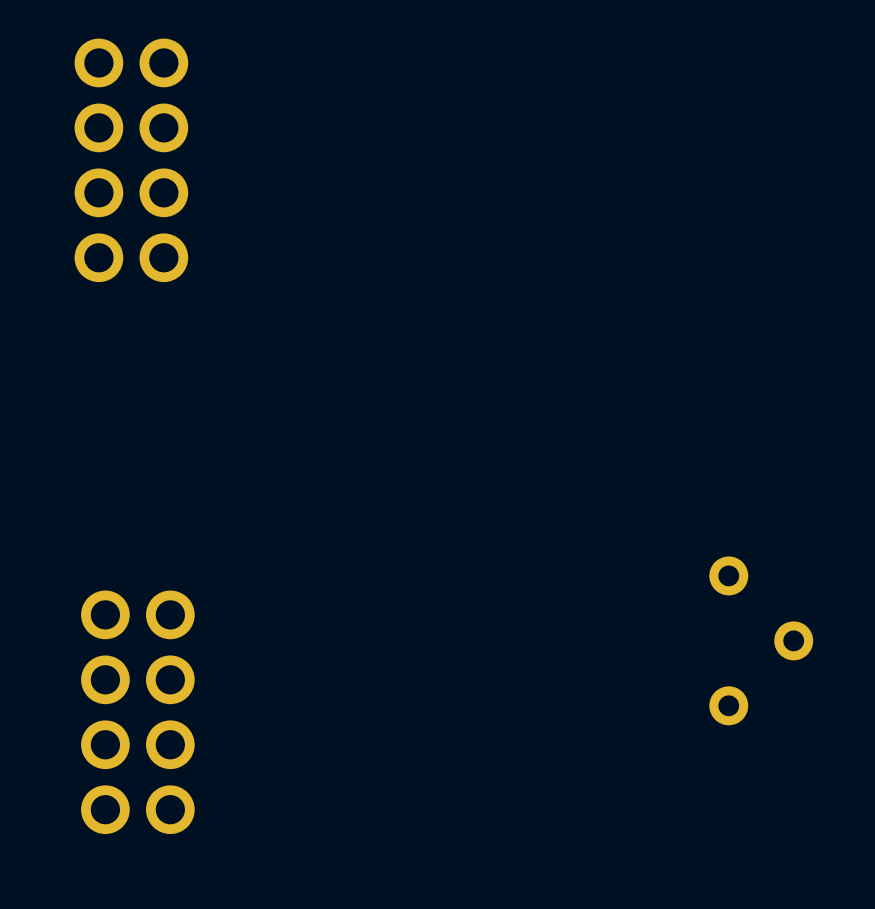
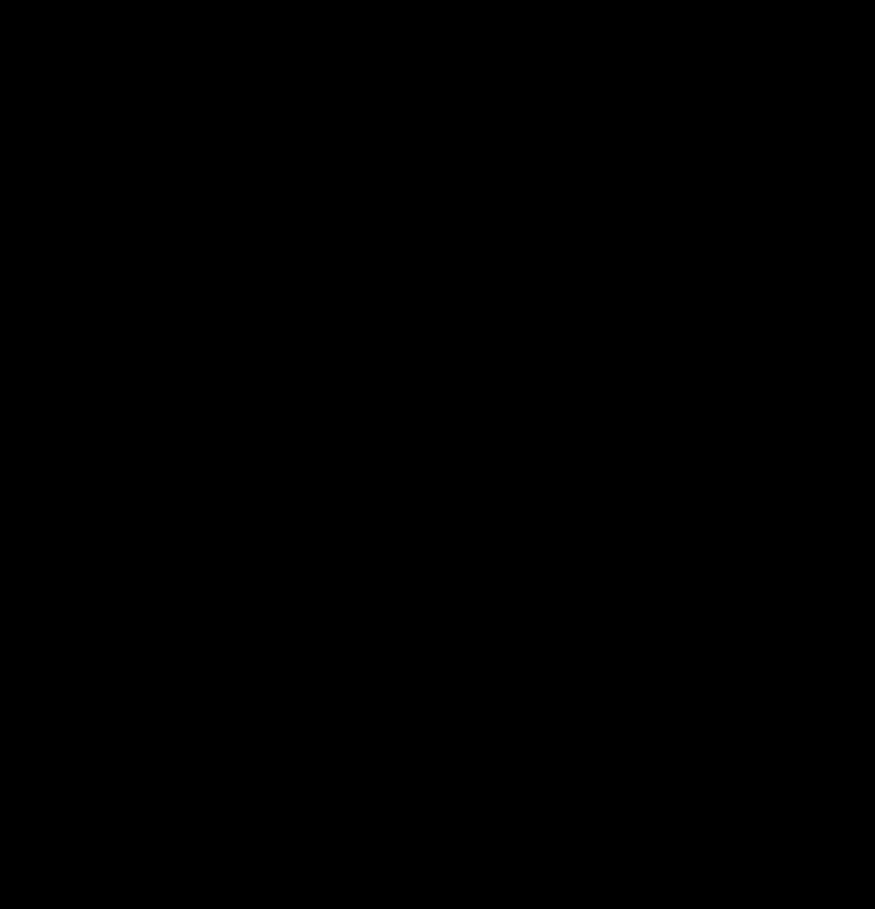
part: (131, 160) -> none
part: (761, 640) -> none
part: (137, 712) -> none

